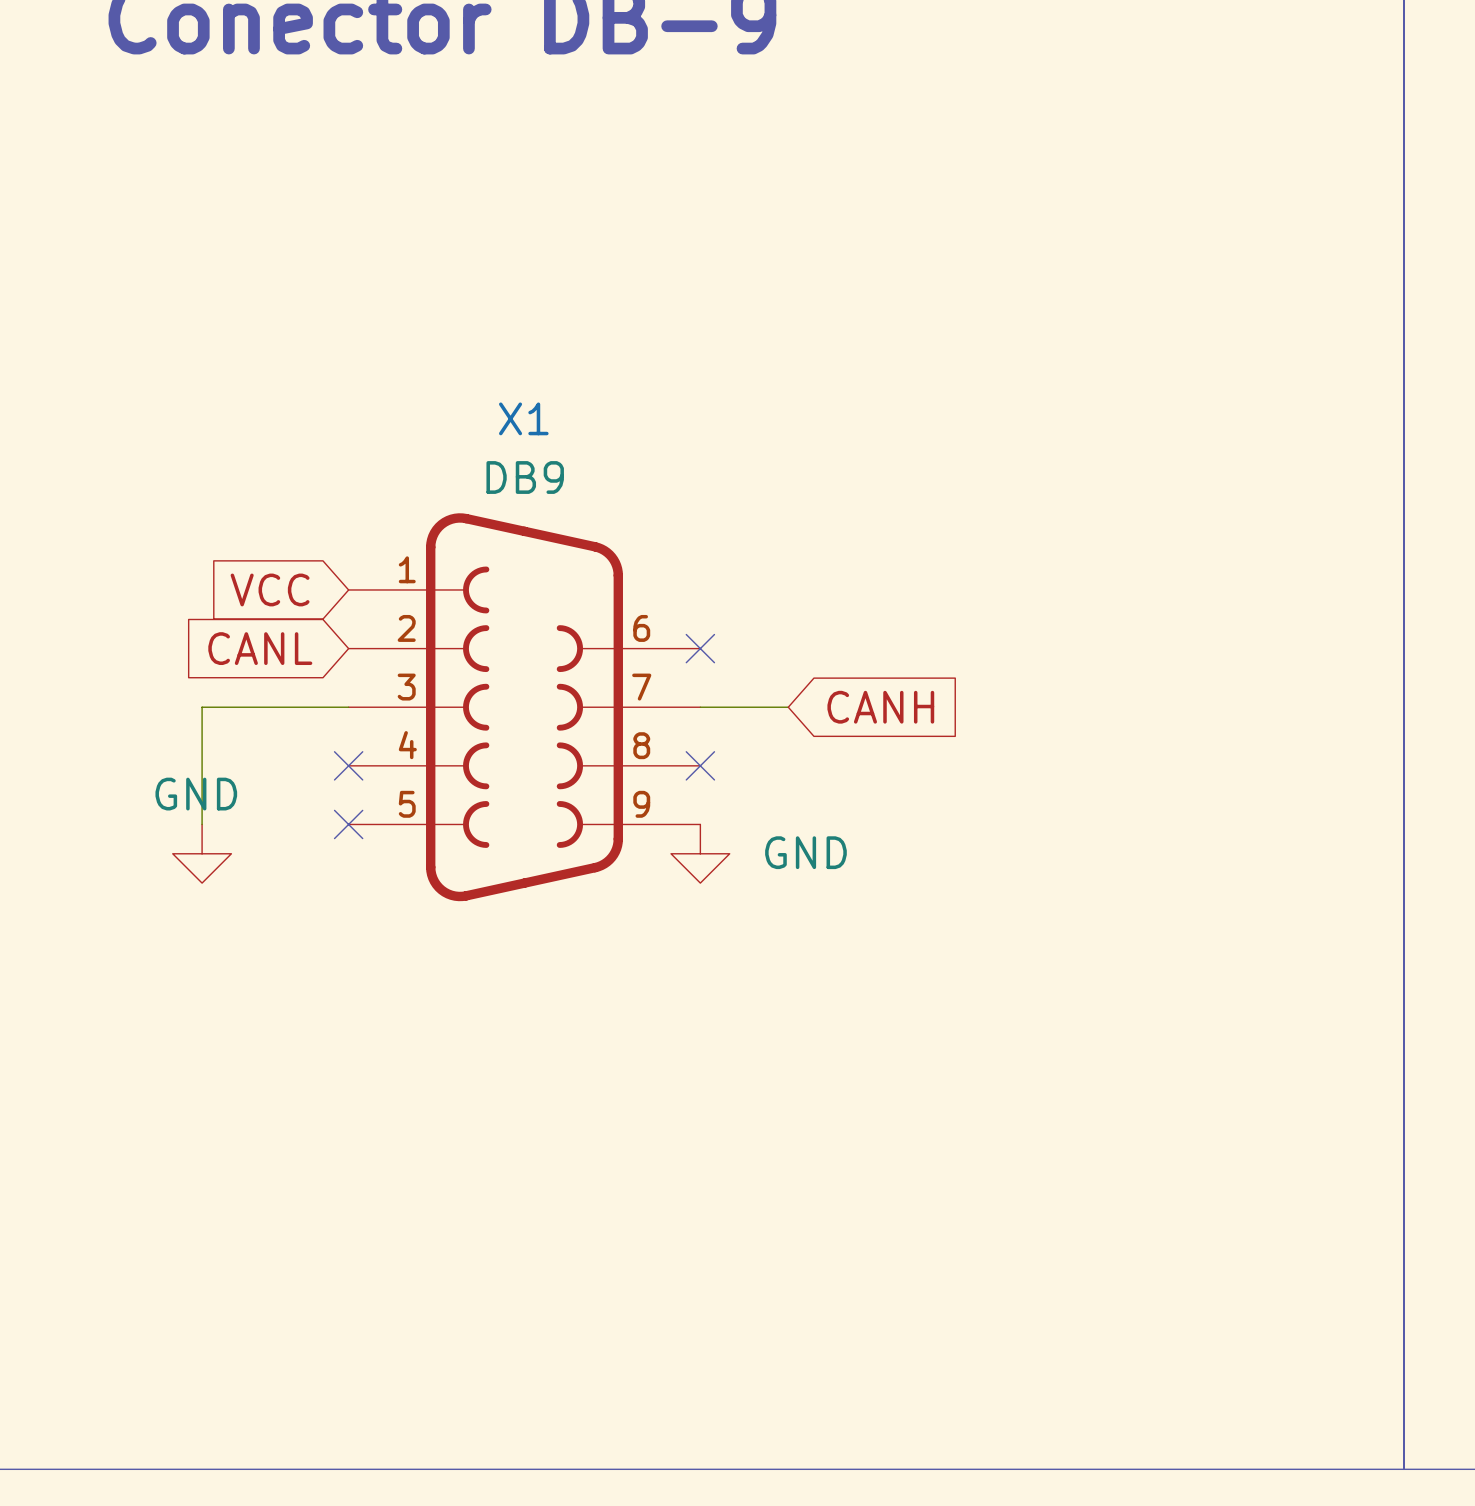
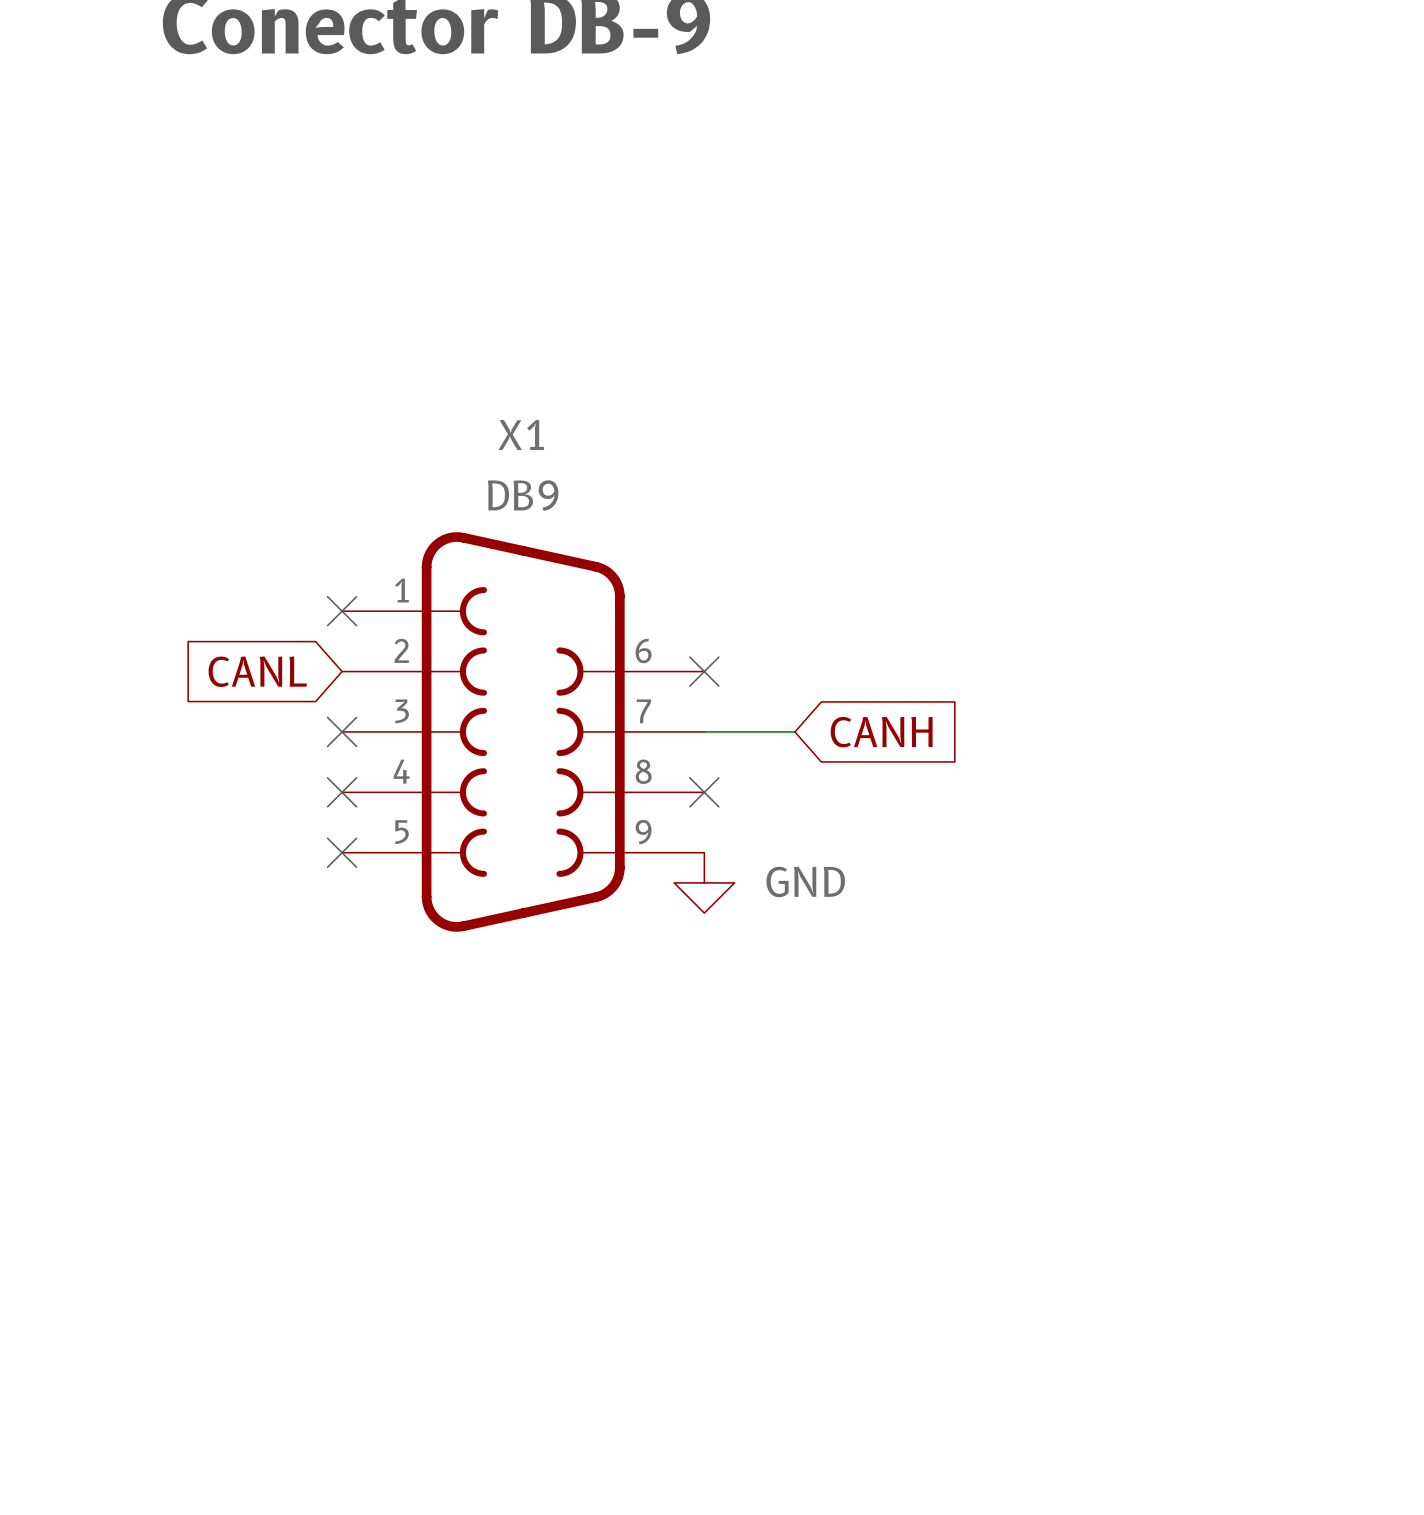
global label: VCC (270, 589) -> none
no-connect mark: none -> (342, 611)
wire: (348, 707) (202, 707) (202, 824) -> none
no-connect mark: none -> (342, 731)
power symbol: GND (202, 853) -> none

